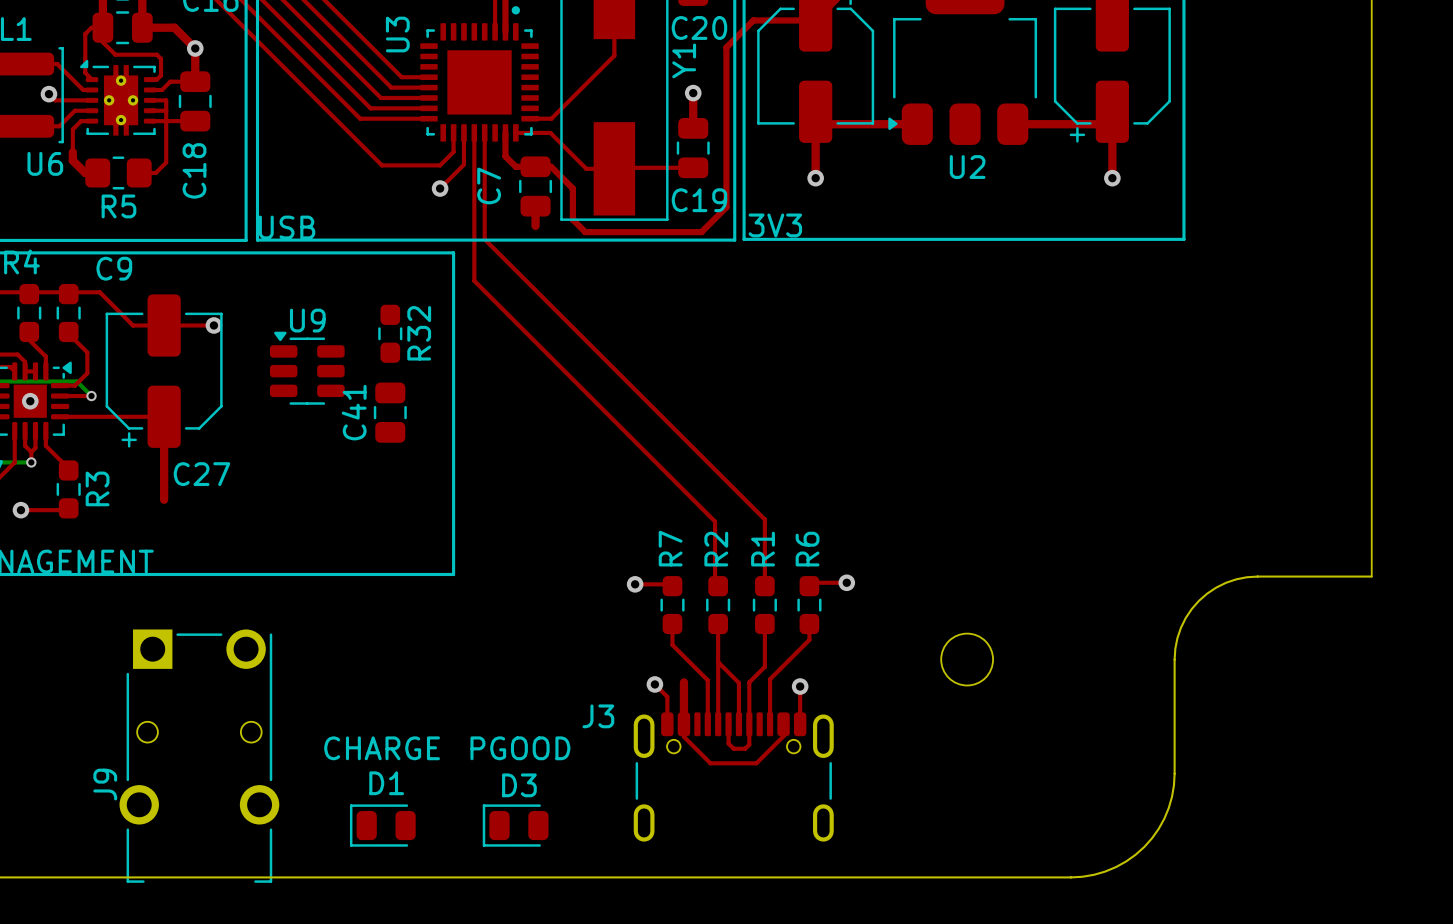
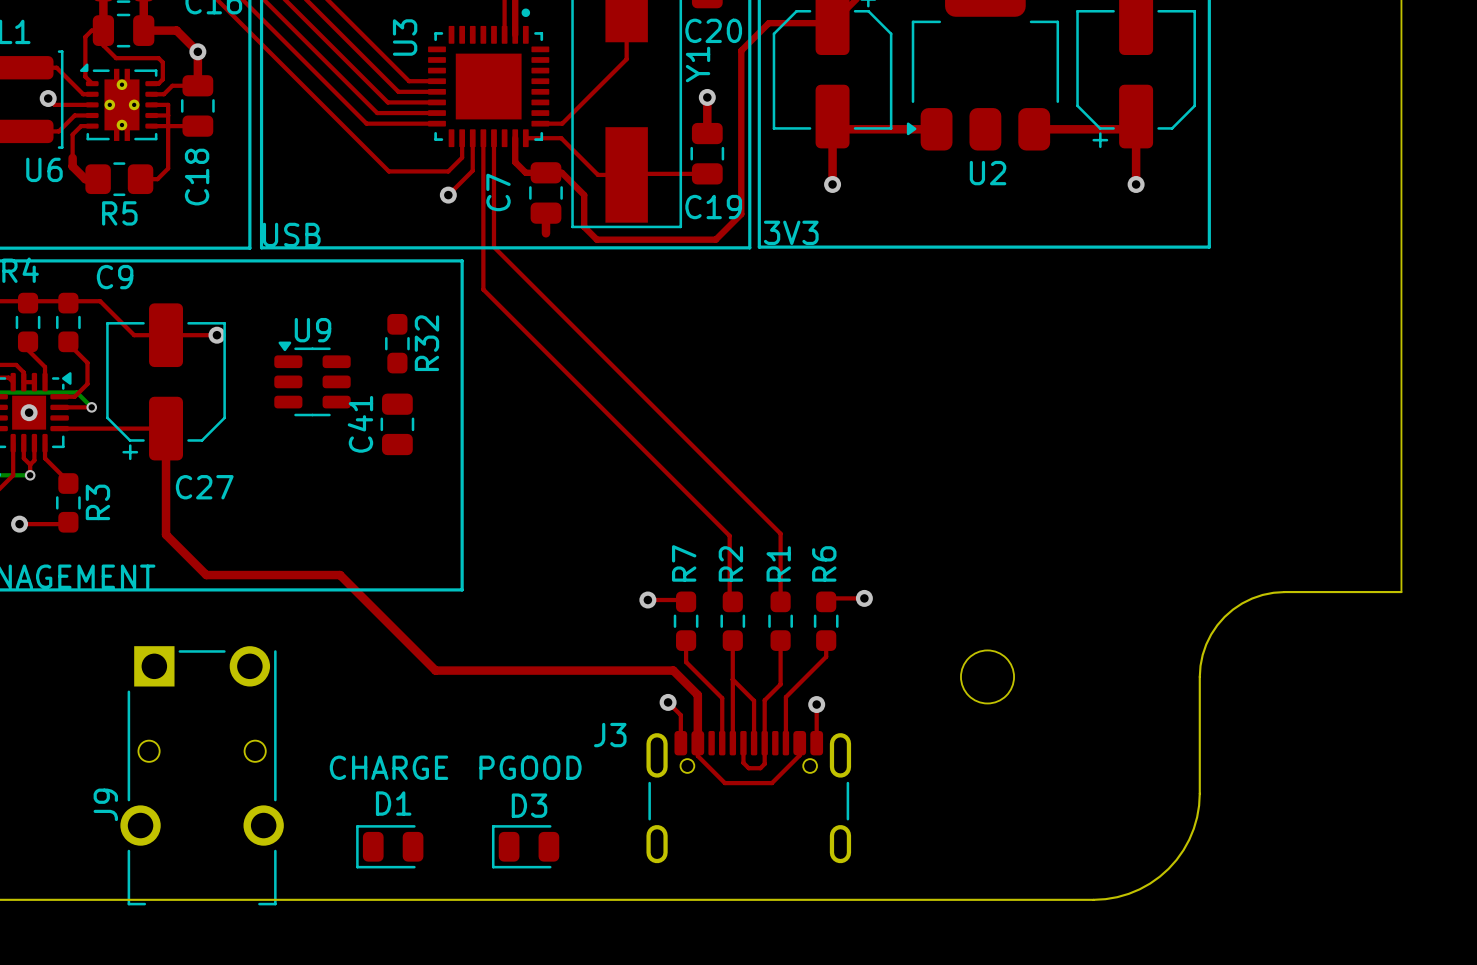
top track: none -> (166, 513) (166, 534) (206, 575) (340, 575) (435, 670) (673, 670) (697, 695) (697, 700)

